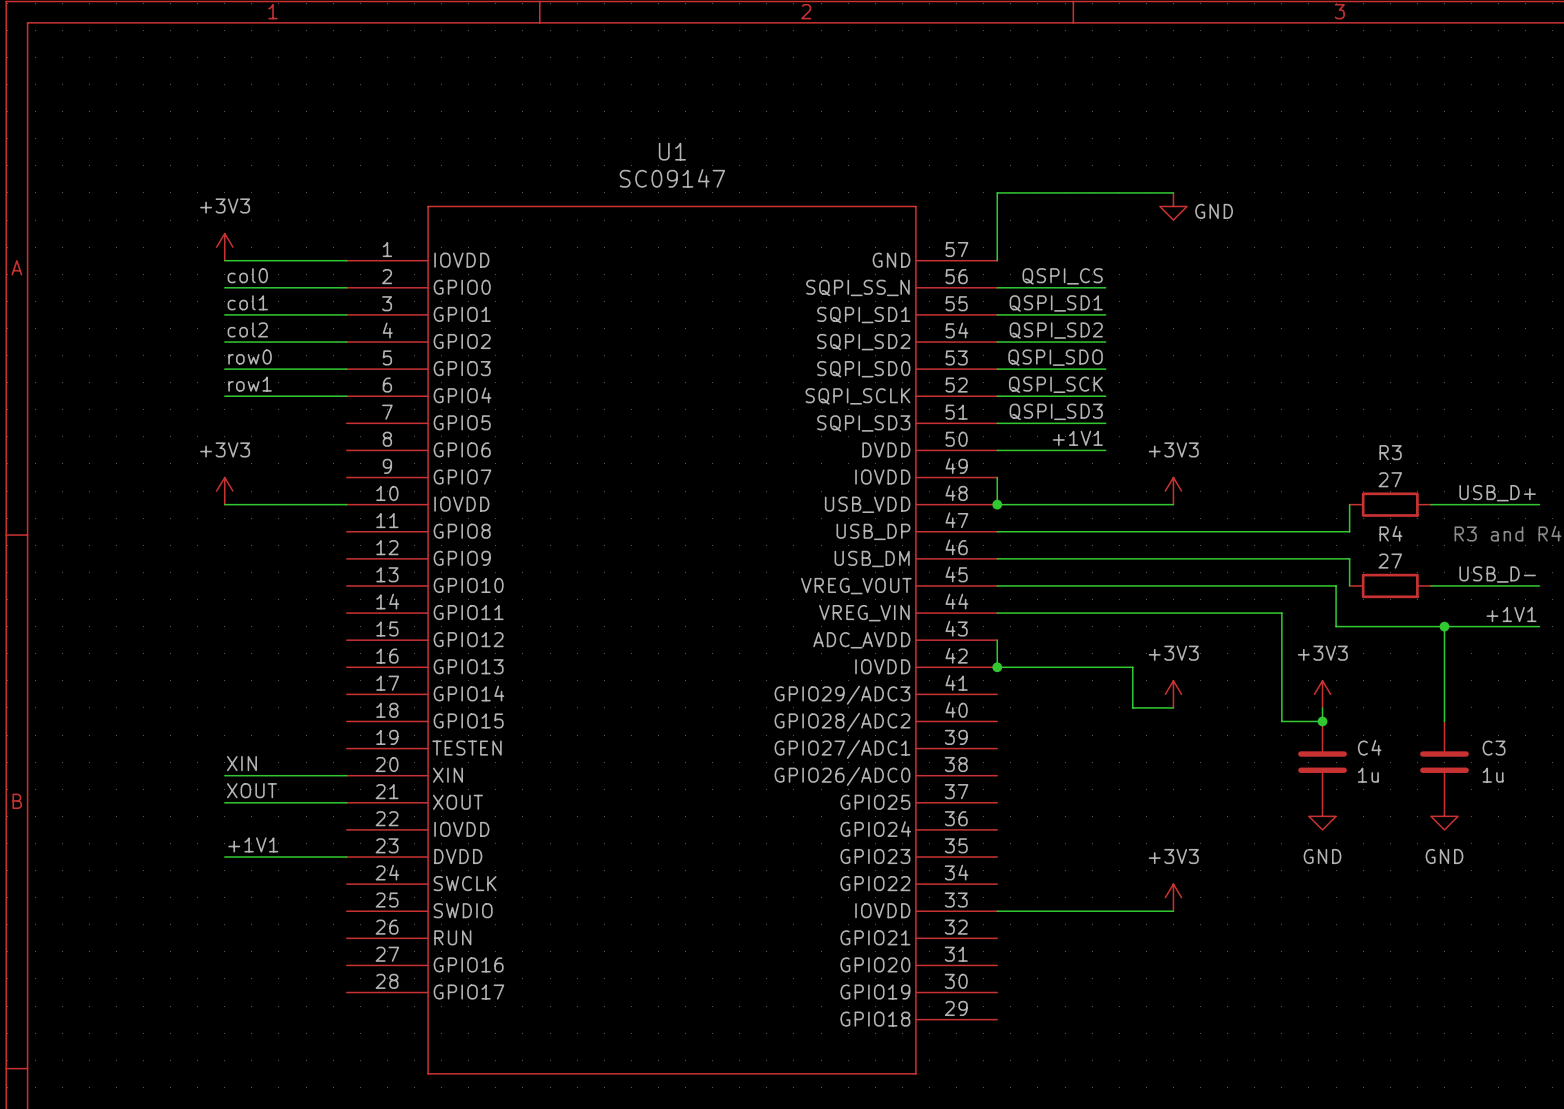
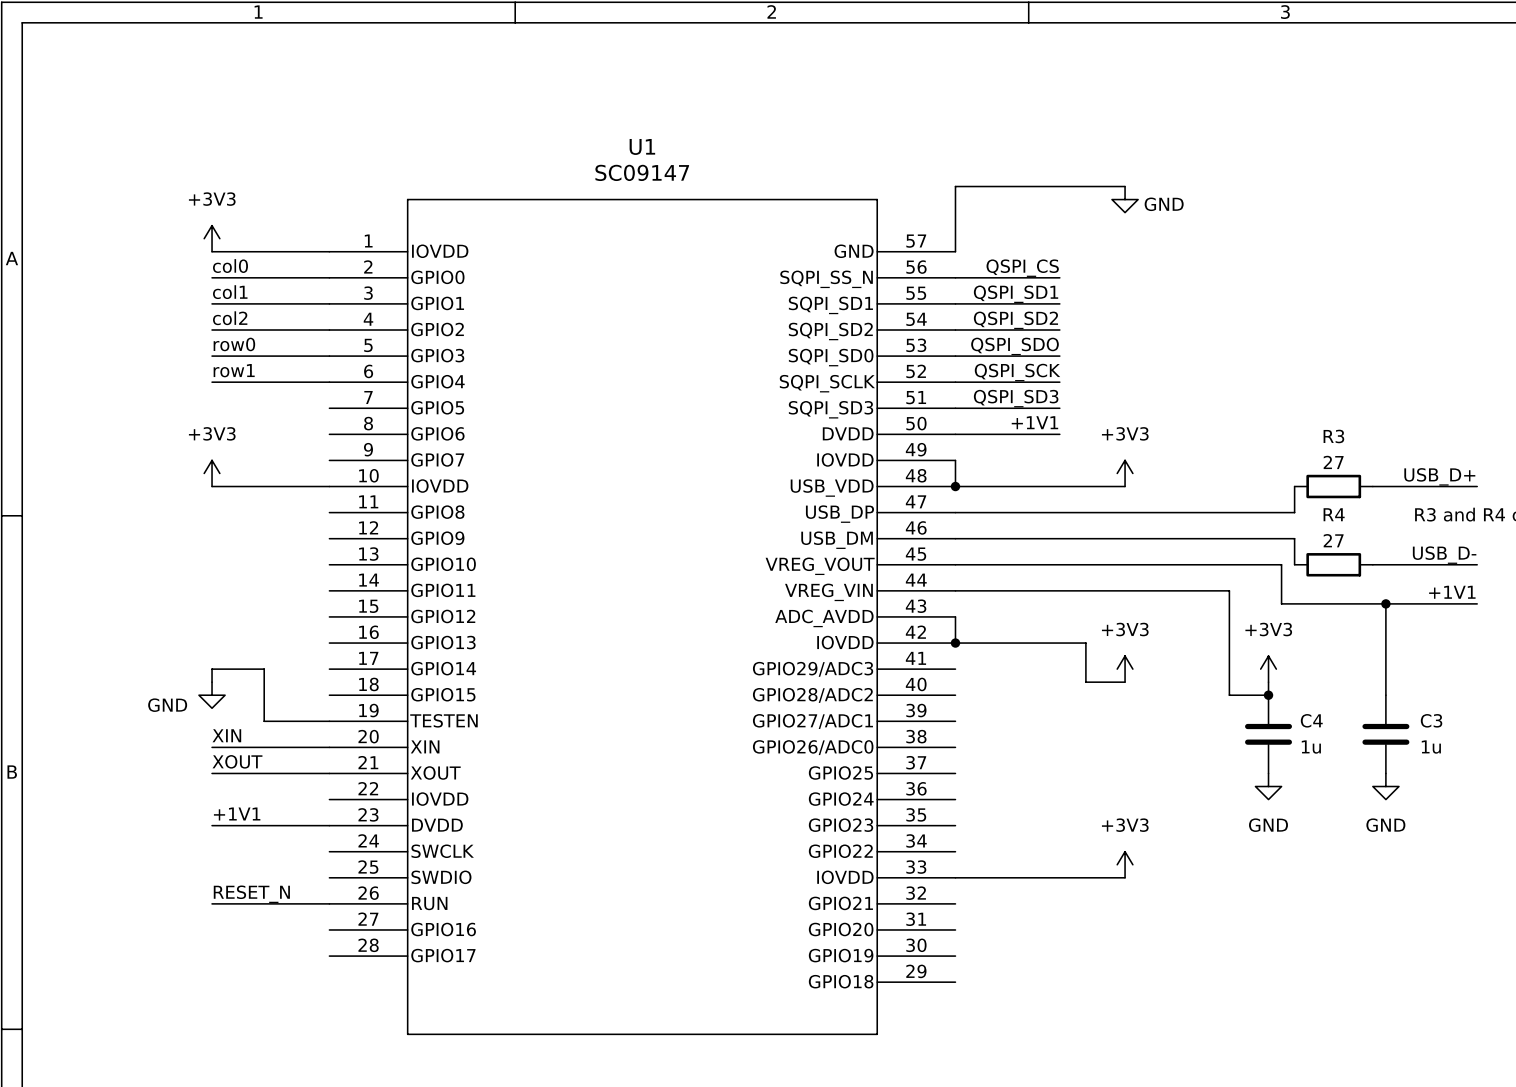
wire: none -> (212, 682) (212, 669) (264, 669) (264, 721) (329, 721)
power symbol: none -> GND (212, 695)
label: none -> RESET_N (251, 894)
wire: none -> (212, 903) (329, 903)

